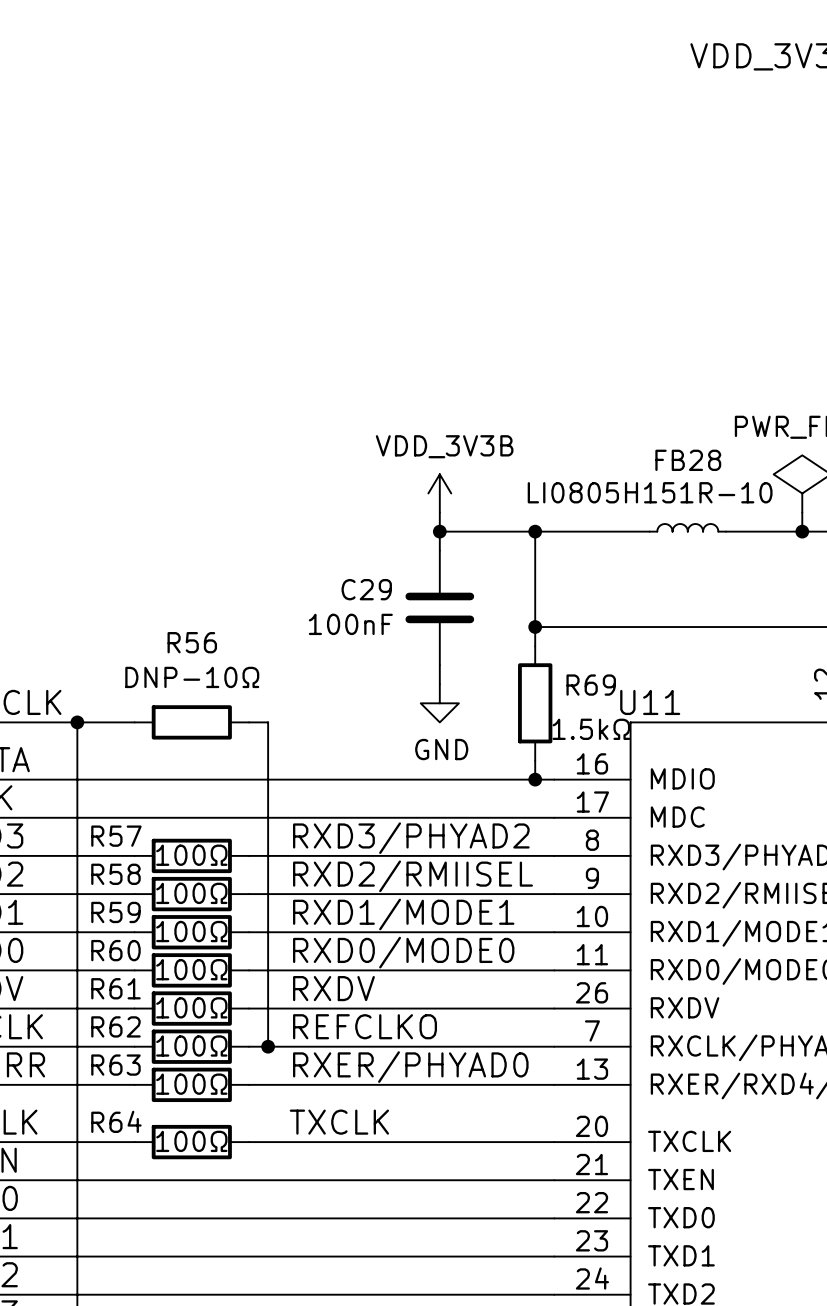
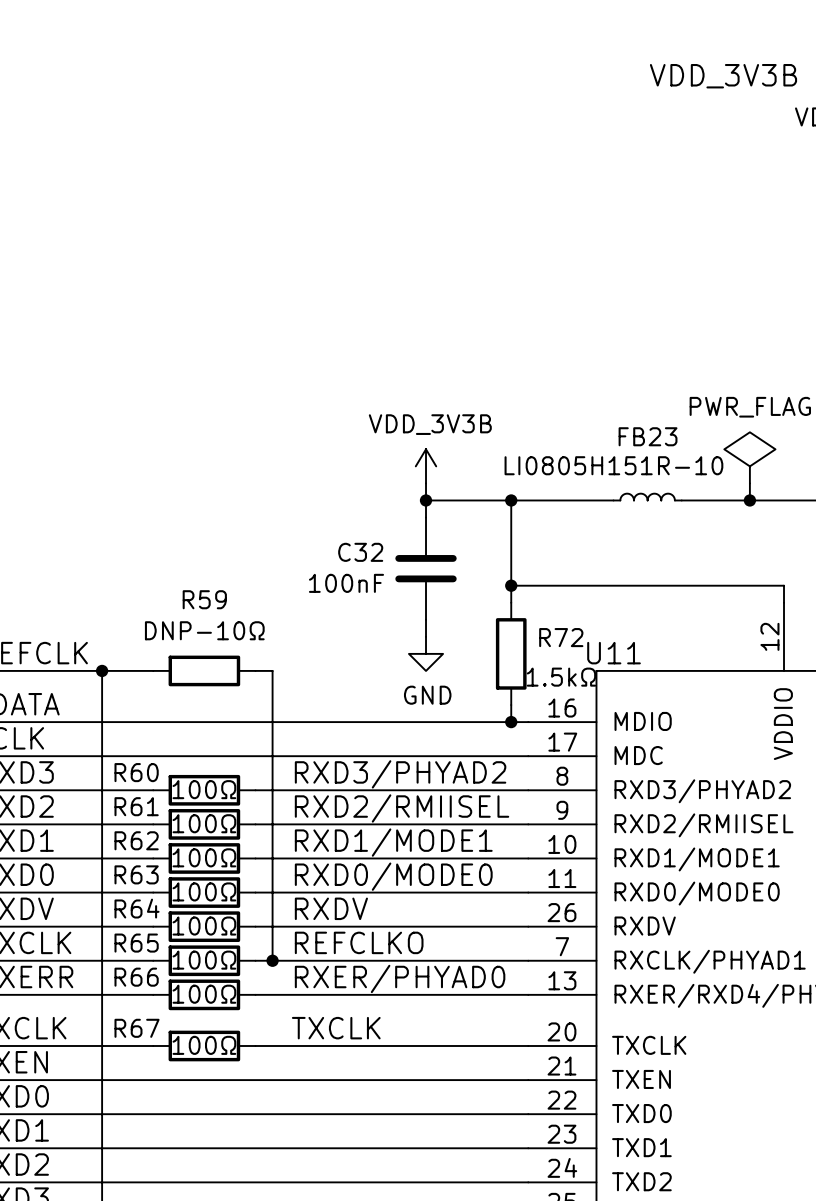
FB28 name: FB28 (688, 460) -> FB23 (648, 436)
C29 name: C29 (366, 589) -> C32 (360, 552)
R56 name: R56 (192, 642) -> R59 (204, 599)
R69 name: R69 (591, 685) -> R72 (561, 637)
R57 name: R57 (116, 836) -> R60 (136, 772)
R58 name: R58 (115, 874) -> R61 (136, 806)
R59 name: R59 (115, 912) -> R62 (136, 840)
R60 name: R60 (115, 950) -> R63 (136, 874)
R61 name: R61 (115, 988) -> R64 (137, 908)
R62 name: R62 (115, 1026) -> R65 (136, 943)
R63 name: R63 (115, 1065) -> R66 (136, 977)
R64 name: R64 (116, 1121) -> R67 (137, 1028)

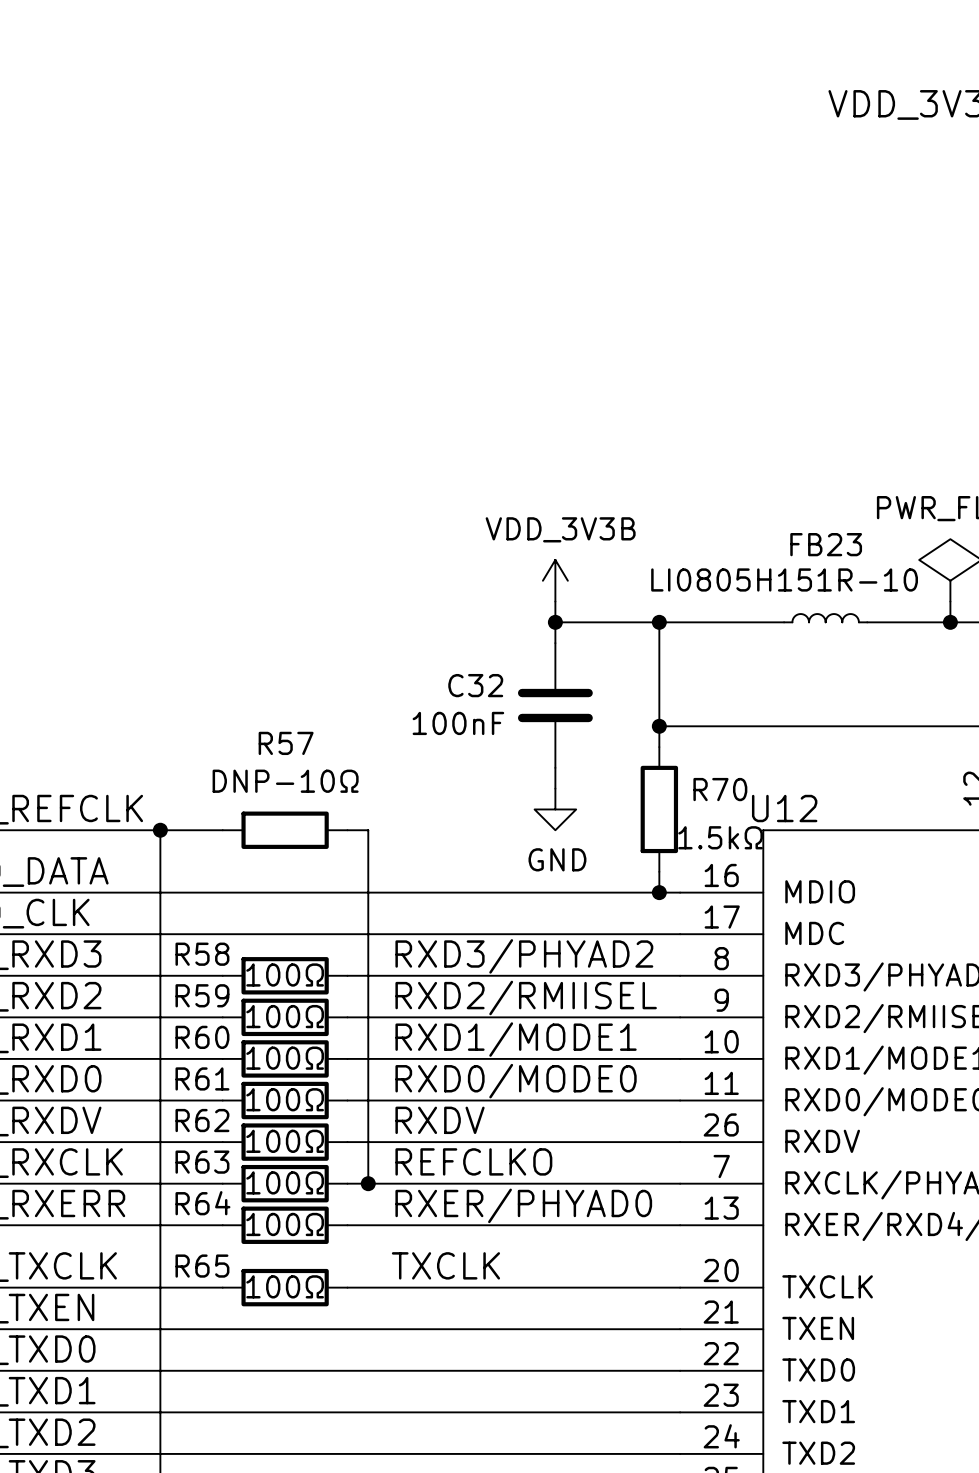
R59 name: R59 (204, 599) -> R57 (286, 743)
R72 name: R72 (561, 637) -> R70 (720, 789)
U11 name: U11 (614, 653) -> U12 (784, 808)
R60 name: R60 (136, 772) -> R58 (202, 954)
R61 name: R61 (136, 806) -> R59 (202, 995)
R62 name: R62 (136, 840) -> R60 (202, 1037)
R63 name: R63 (136, 874) -> R61 (202, 1078)
R64 name: R64 (137, 908) -> R62 (202, 1120)
R65 name: R65 (136, 943) -> R63 (202, 1162)
R66 name: R66 (136, 977) -> R64 (202, 1203)
R67 name: R67 (137, 1028) -> R65 (202, 1266)

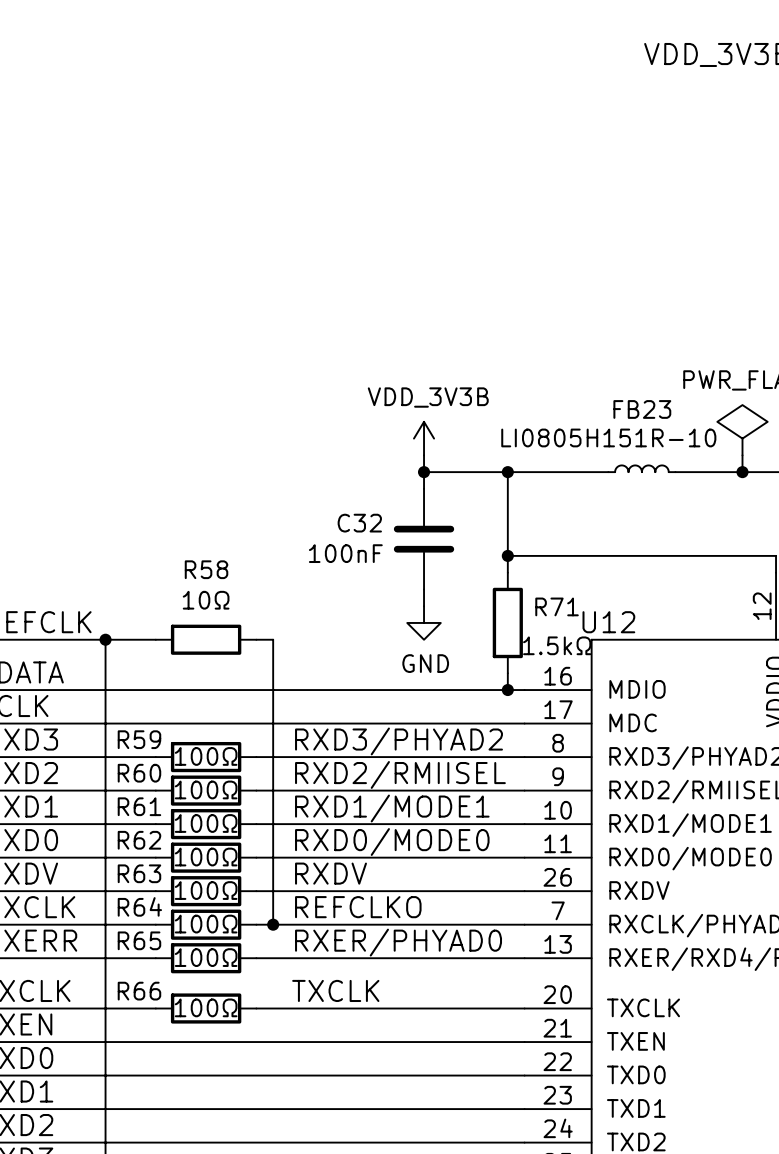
R57 name: R57 (286, 743) -> R58 (206, 569)
R57 value: DNP-10Ω (285, 781) -> 10Ω (206, 600)
R70 name: R70 (720, 789) -> R71 (557, 606)
R58 name: R58 (202, 954) -> R59 (139, 739)
R59 name: R59 (202, 995) -> R60 (139, 773)
R60 name: R60 (202, 1037) -> R61 (139, 806)
R61 name: R61 (202, 1078) -> R62 (139, 840)
R62 name: R62 (202, 1120) -> R63 (139, 873)
R63 name: R63 (202, 1162) -> R64 (139, 906)
R64 name: R64 (202, 1203) -> R65 (139, 940)
R65 name: R65 (202, 1266) -> R66 (139, 991)

